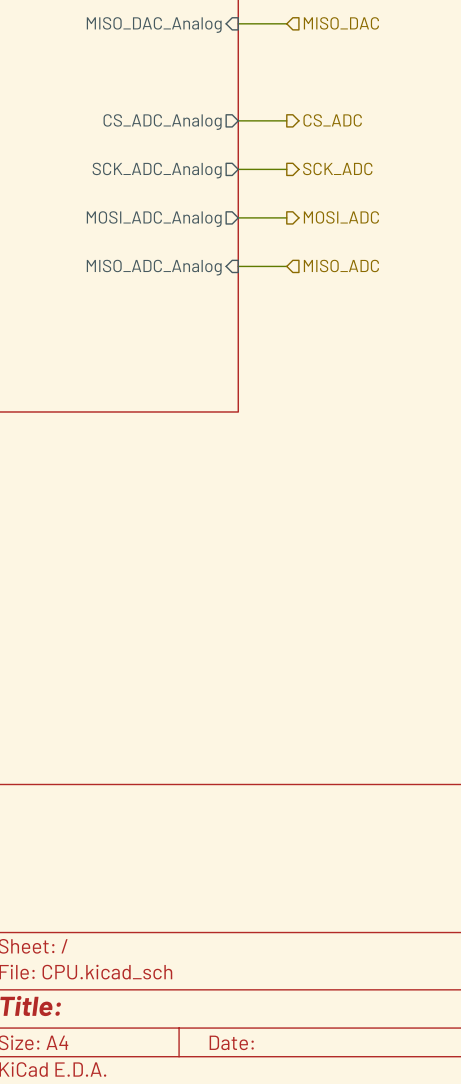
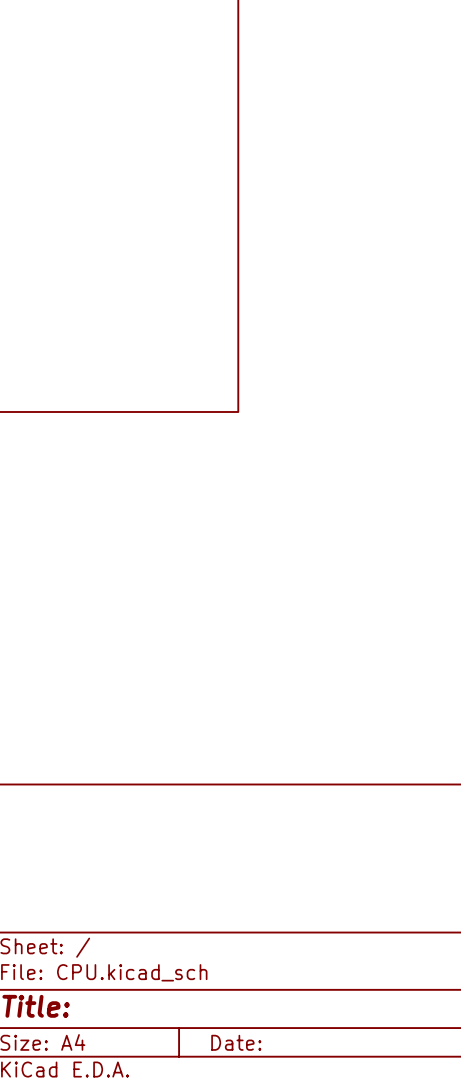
wire: (238, 23) (286, 23) -> none
hierarchical label: MISO_DAC (341, 23) -> none
sheet pin: MISO_DAC_Analog (154, 25) -> none
wire: (238, 120) (286, 120) -> none
hierarchical label: CS_ADC (332, 120) -> none
sheet pin: CS_ADC_Analog (162, 122) -> none
hierarchical label: SCK_ADC (337, 168) -> none
wire: (238, 169) (286, 169) -> none
sheet pin: SCK_ADC_Analog (157, 170) -> none
wire: (238, 217) (286, 217) -> none
hierarchical label: MOSI_ADC (341, 217) -> none
sheet pin: MOSI_ADC_Analog (154, 219) -> none
hierarchical label: MISO_ADC (341, 265) -> none
wire: (238, 266) (286, 266) -> none
sheet pin: MISO_ADC_Analog (154, 267) -> none

